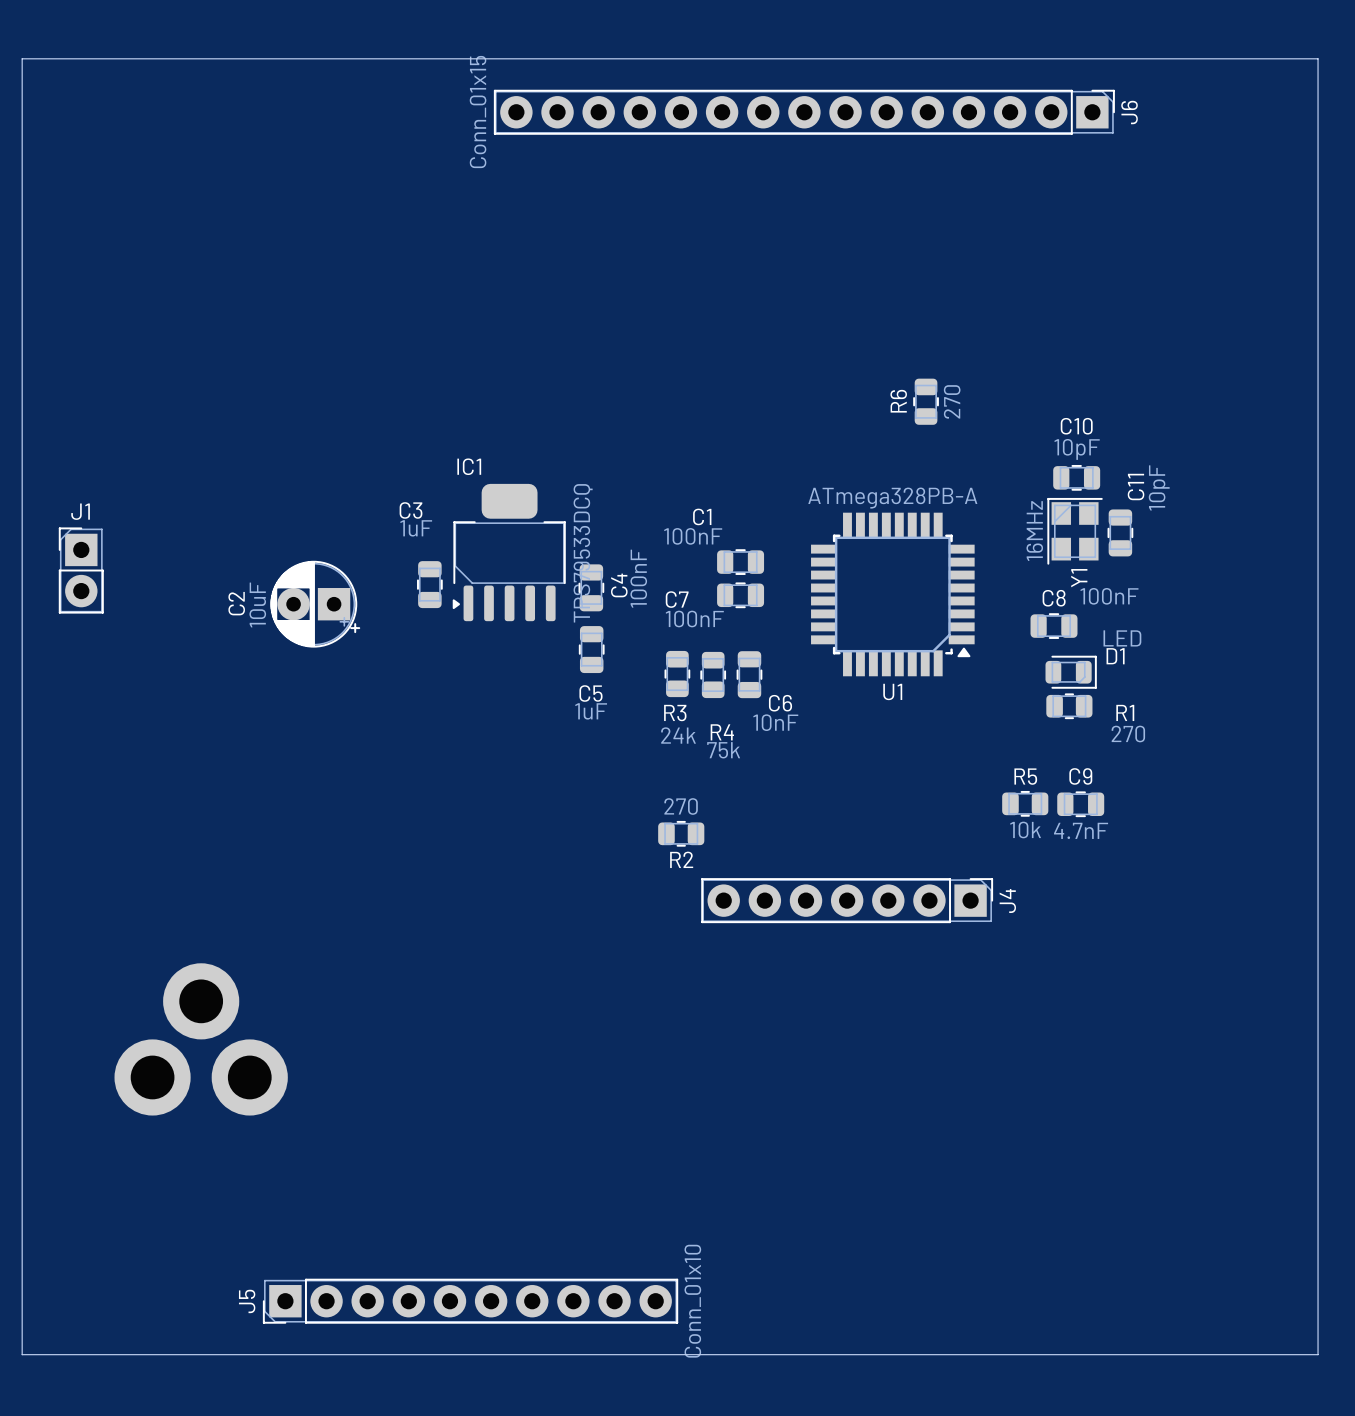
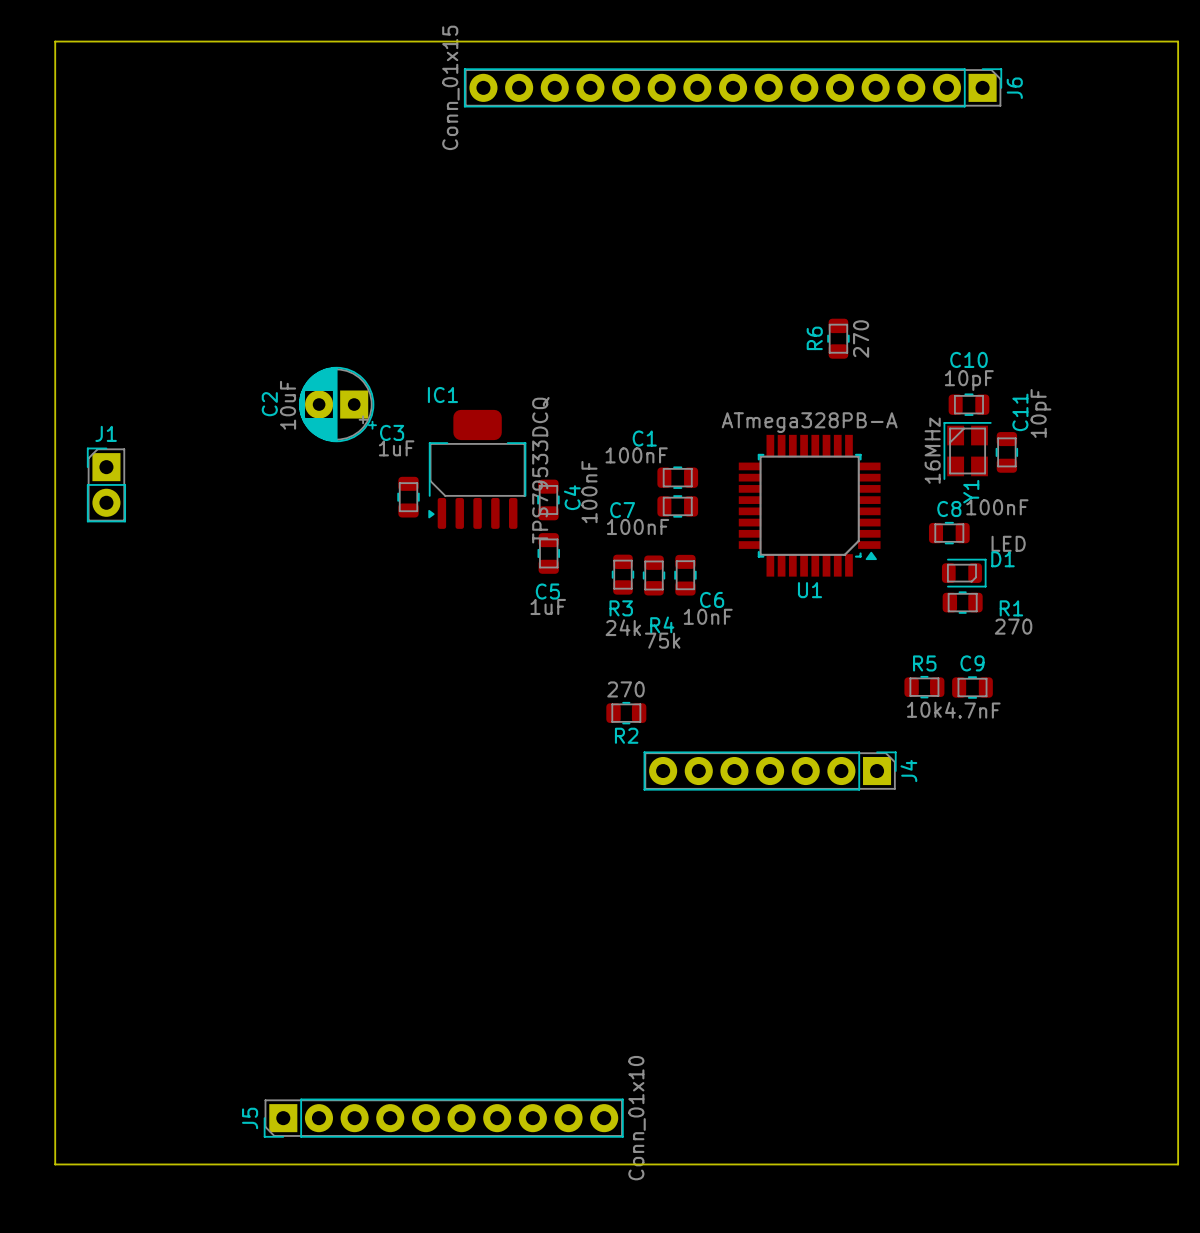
C2 position: (315, 604) -> (337, 404)
part: (201, 1039) -> none

